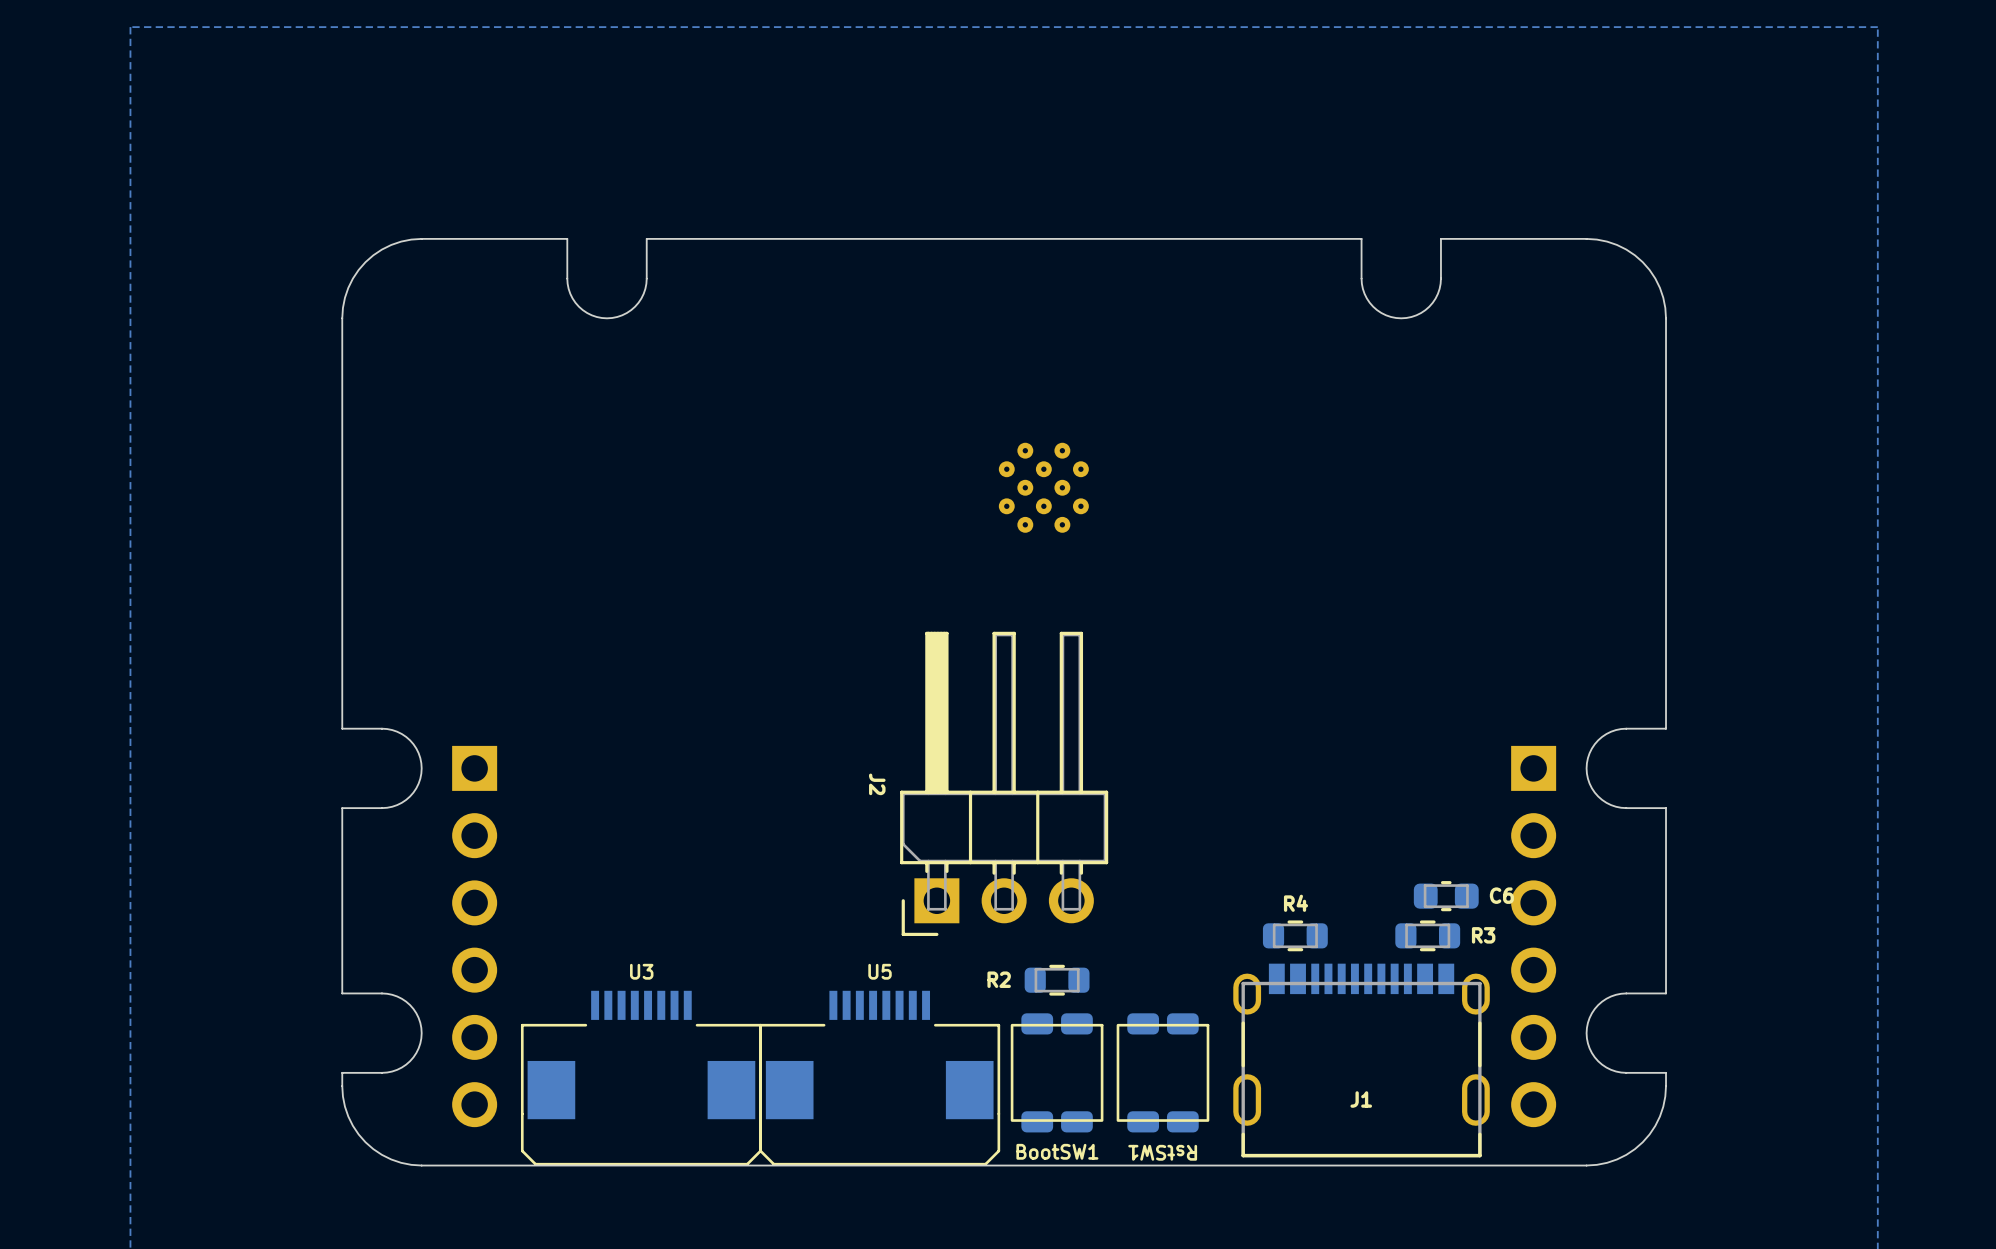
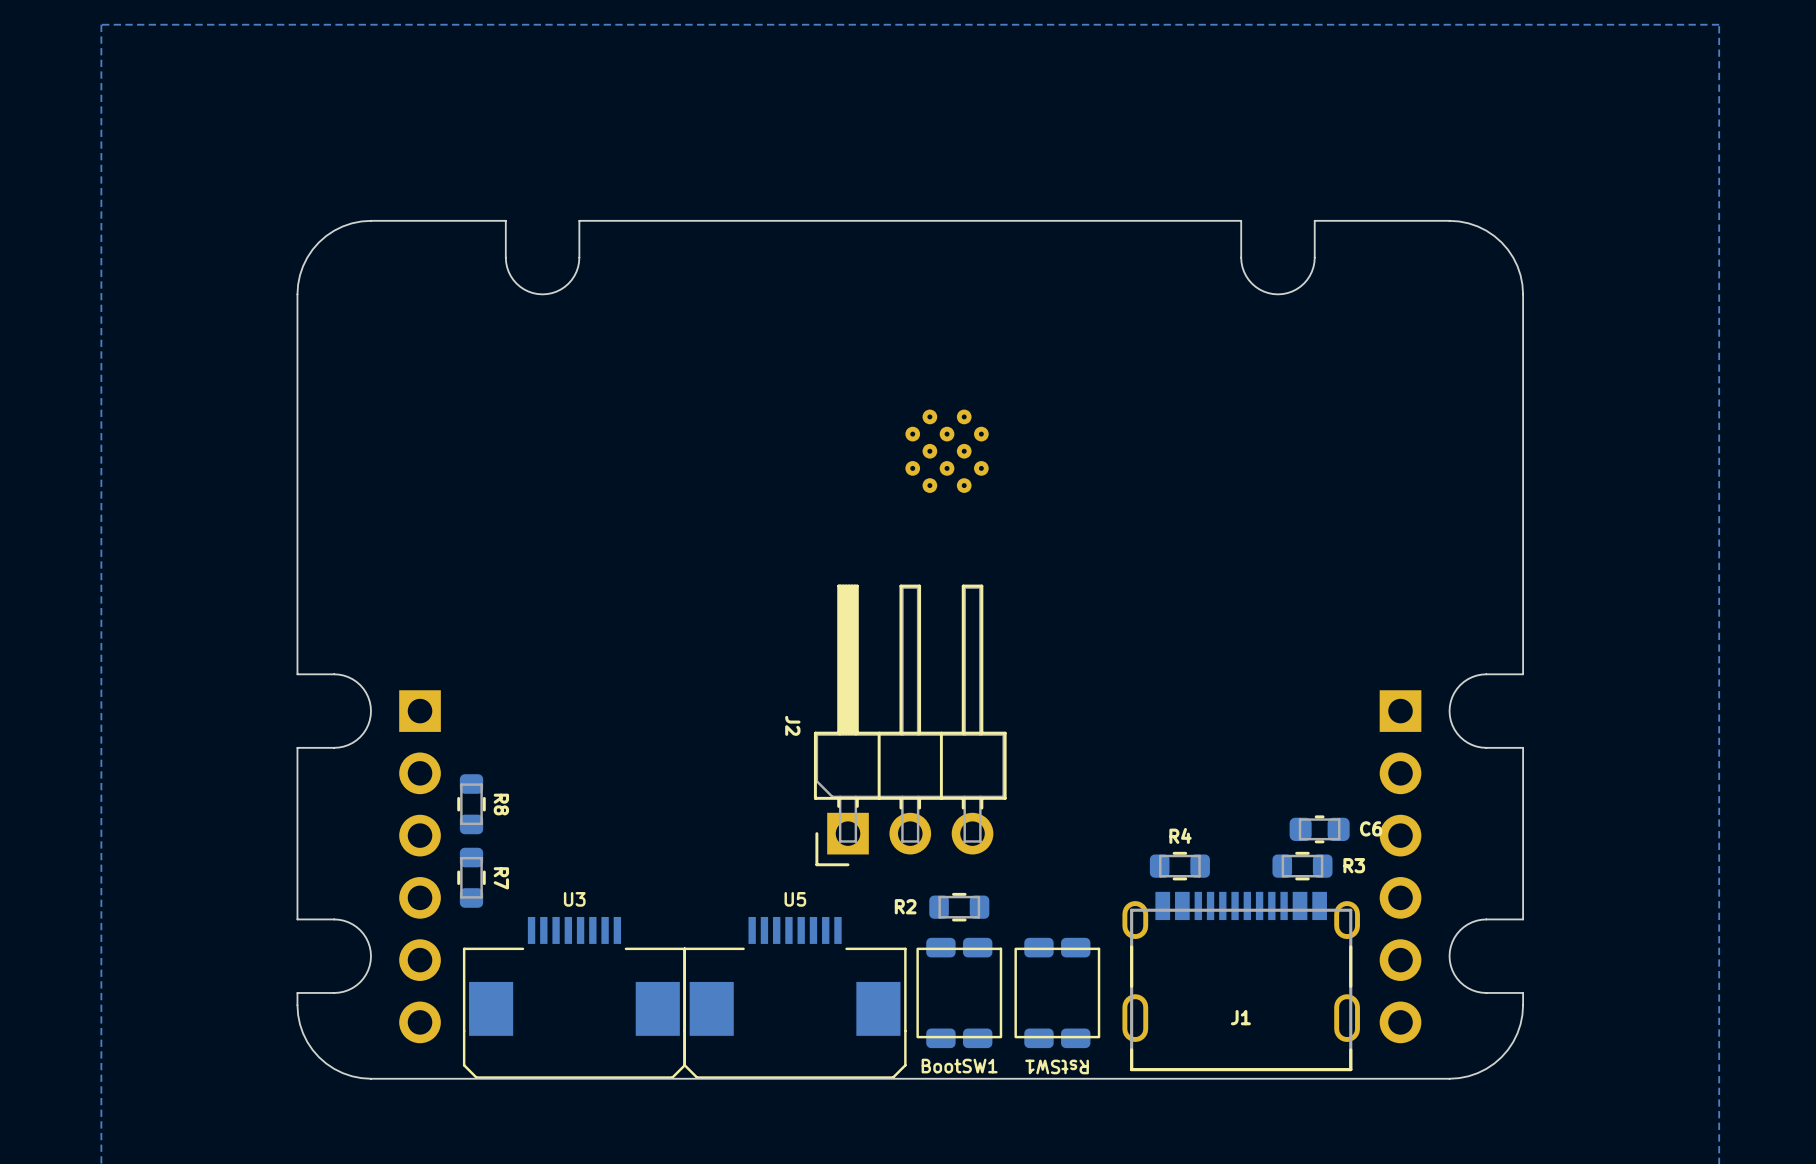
R8: none -> (471, 804)
R7: none -> (471, 877)

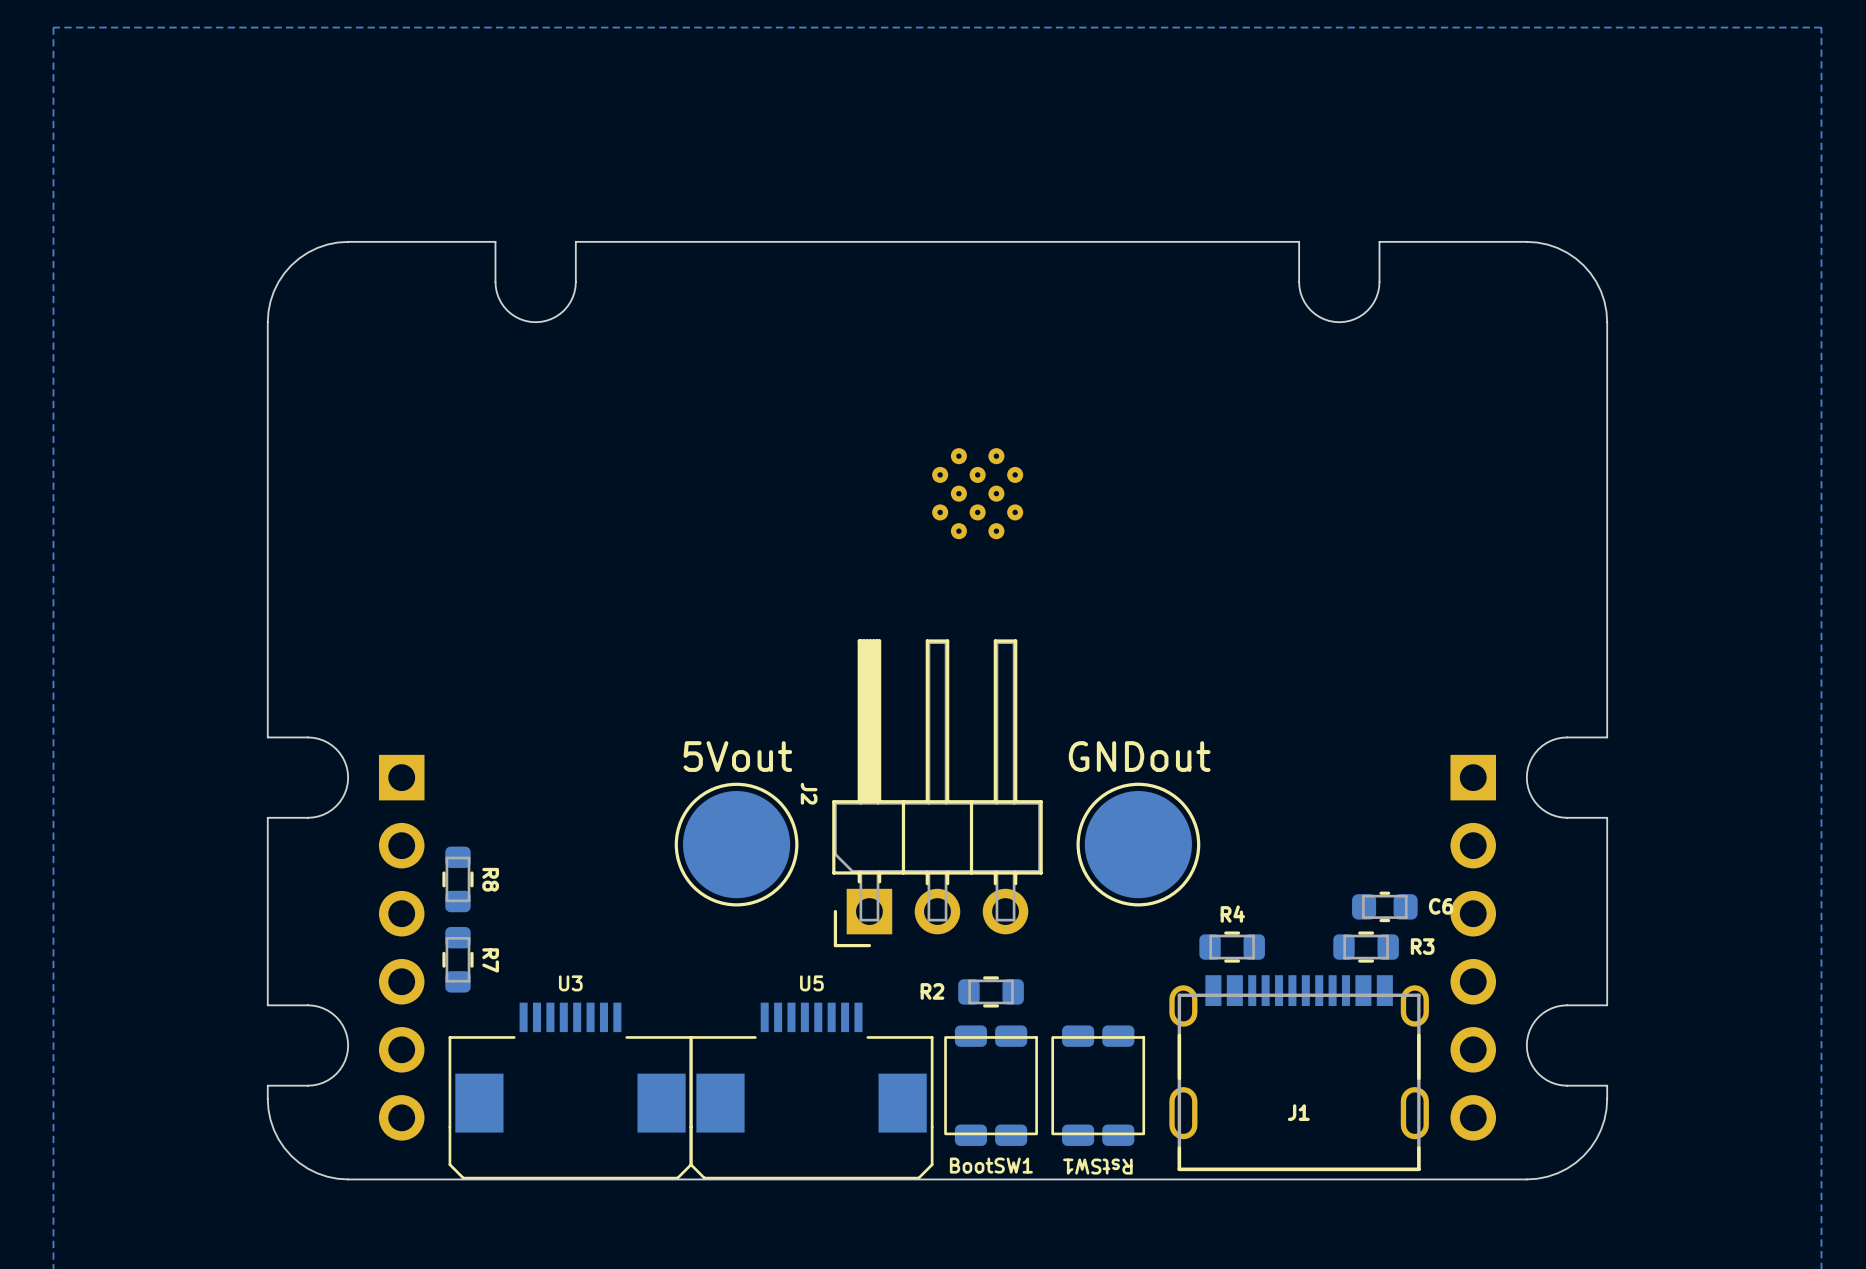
part: none -> 5Vout (736, 844)
part: none -> GNDout (1138, 844)

